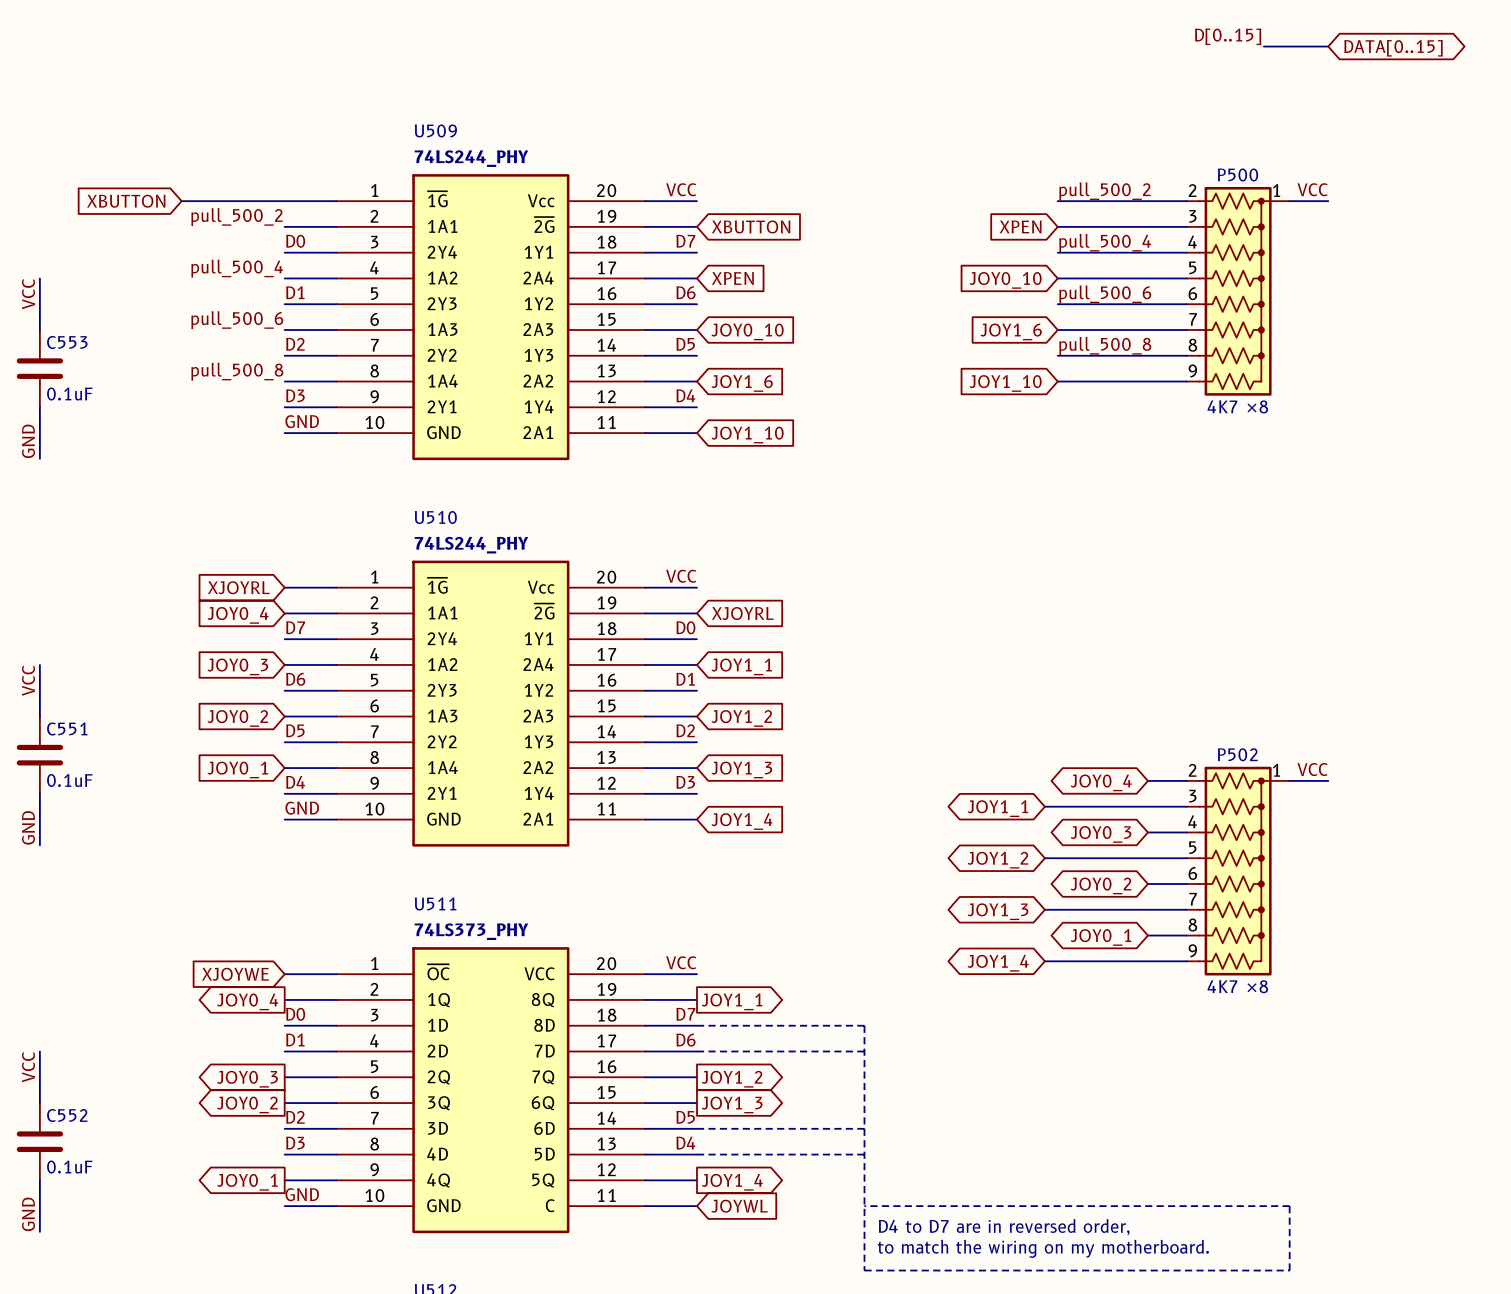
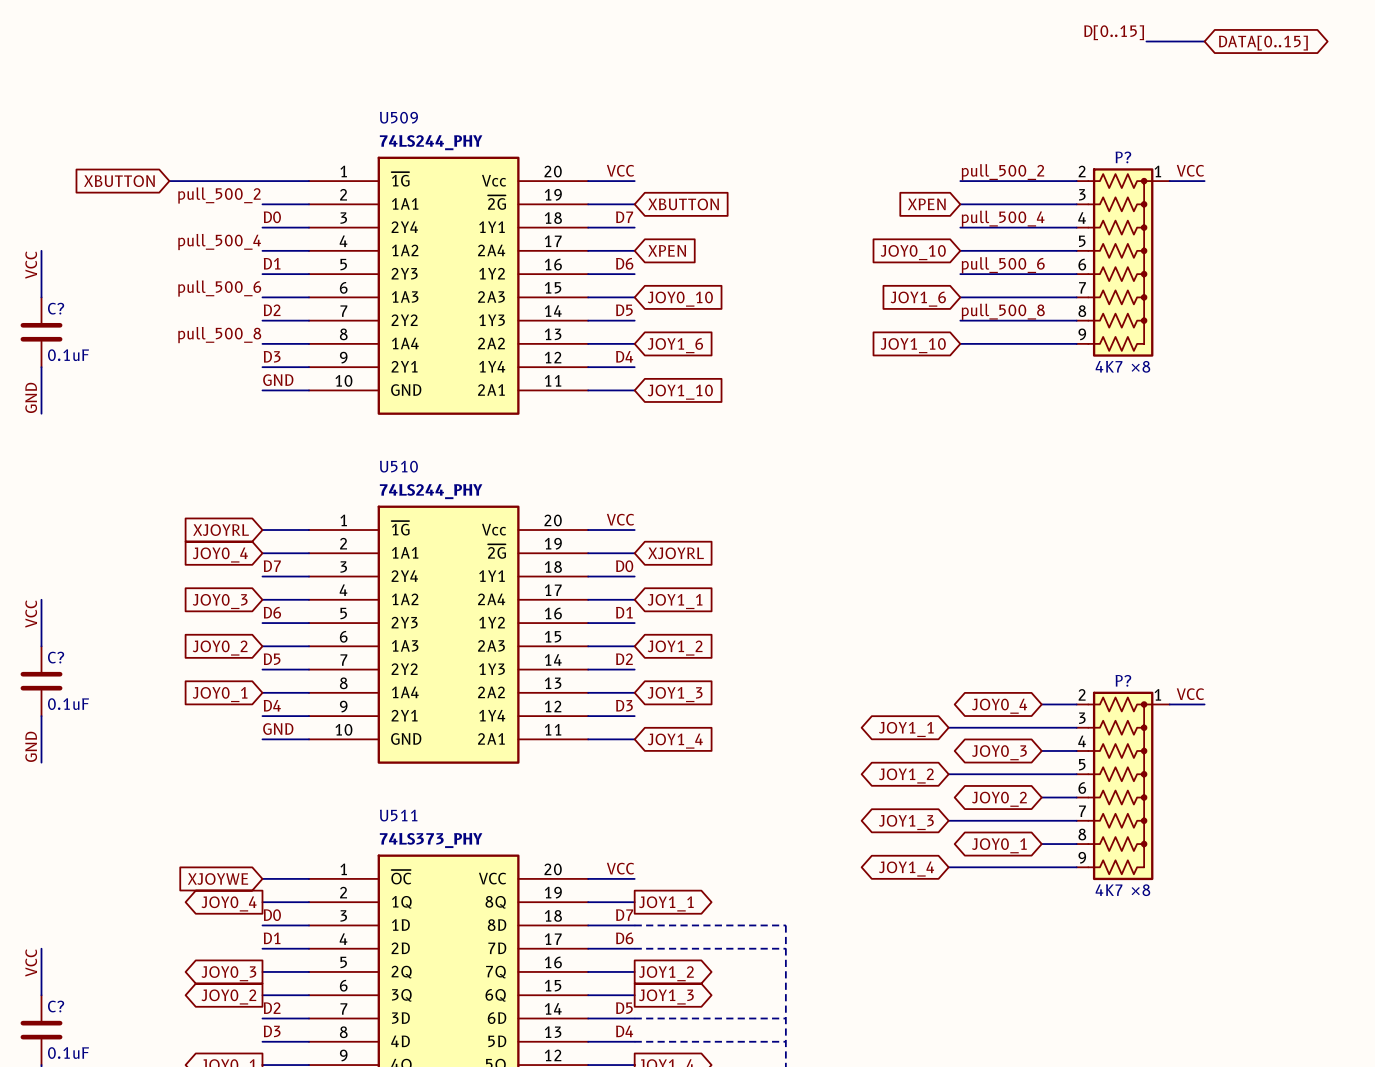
P500 name: P500 (1237, 174) -> P? (1123, 157)
C553 name: C553 (67, 342) -> C? (56, 308)
C551 name: C551 (67, 728) -> C? (56, 657)
P502 name: P502 (1237, 754) -> P? (1123, 680)
C552 name: C552 (67, 1115) -> C? (56, 1006)

